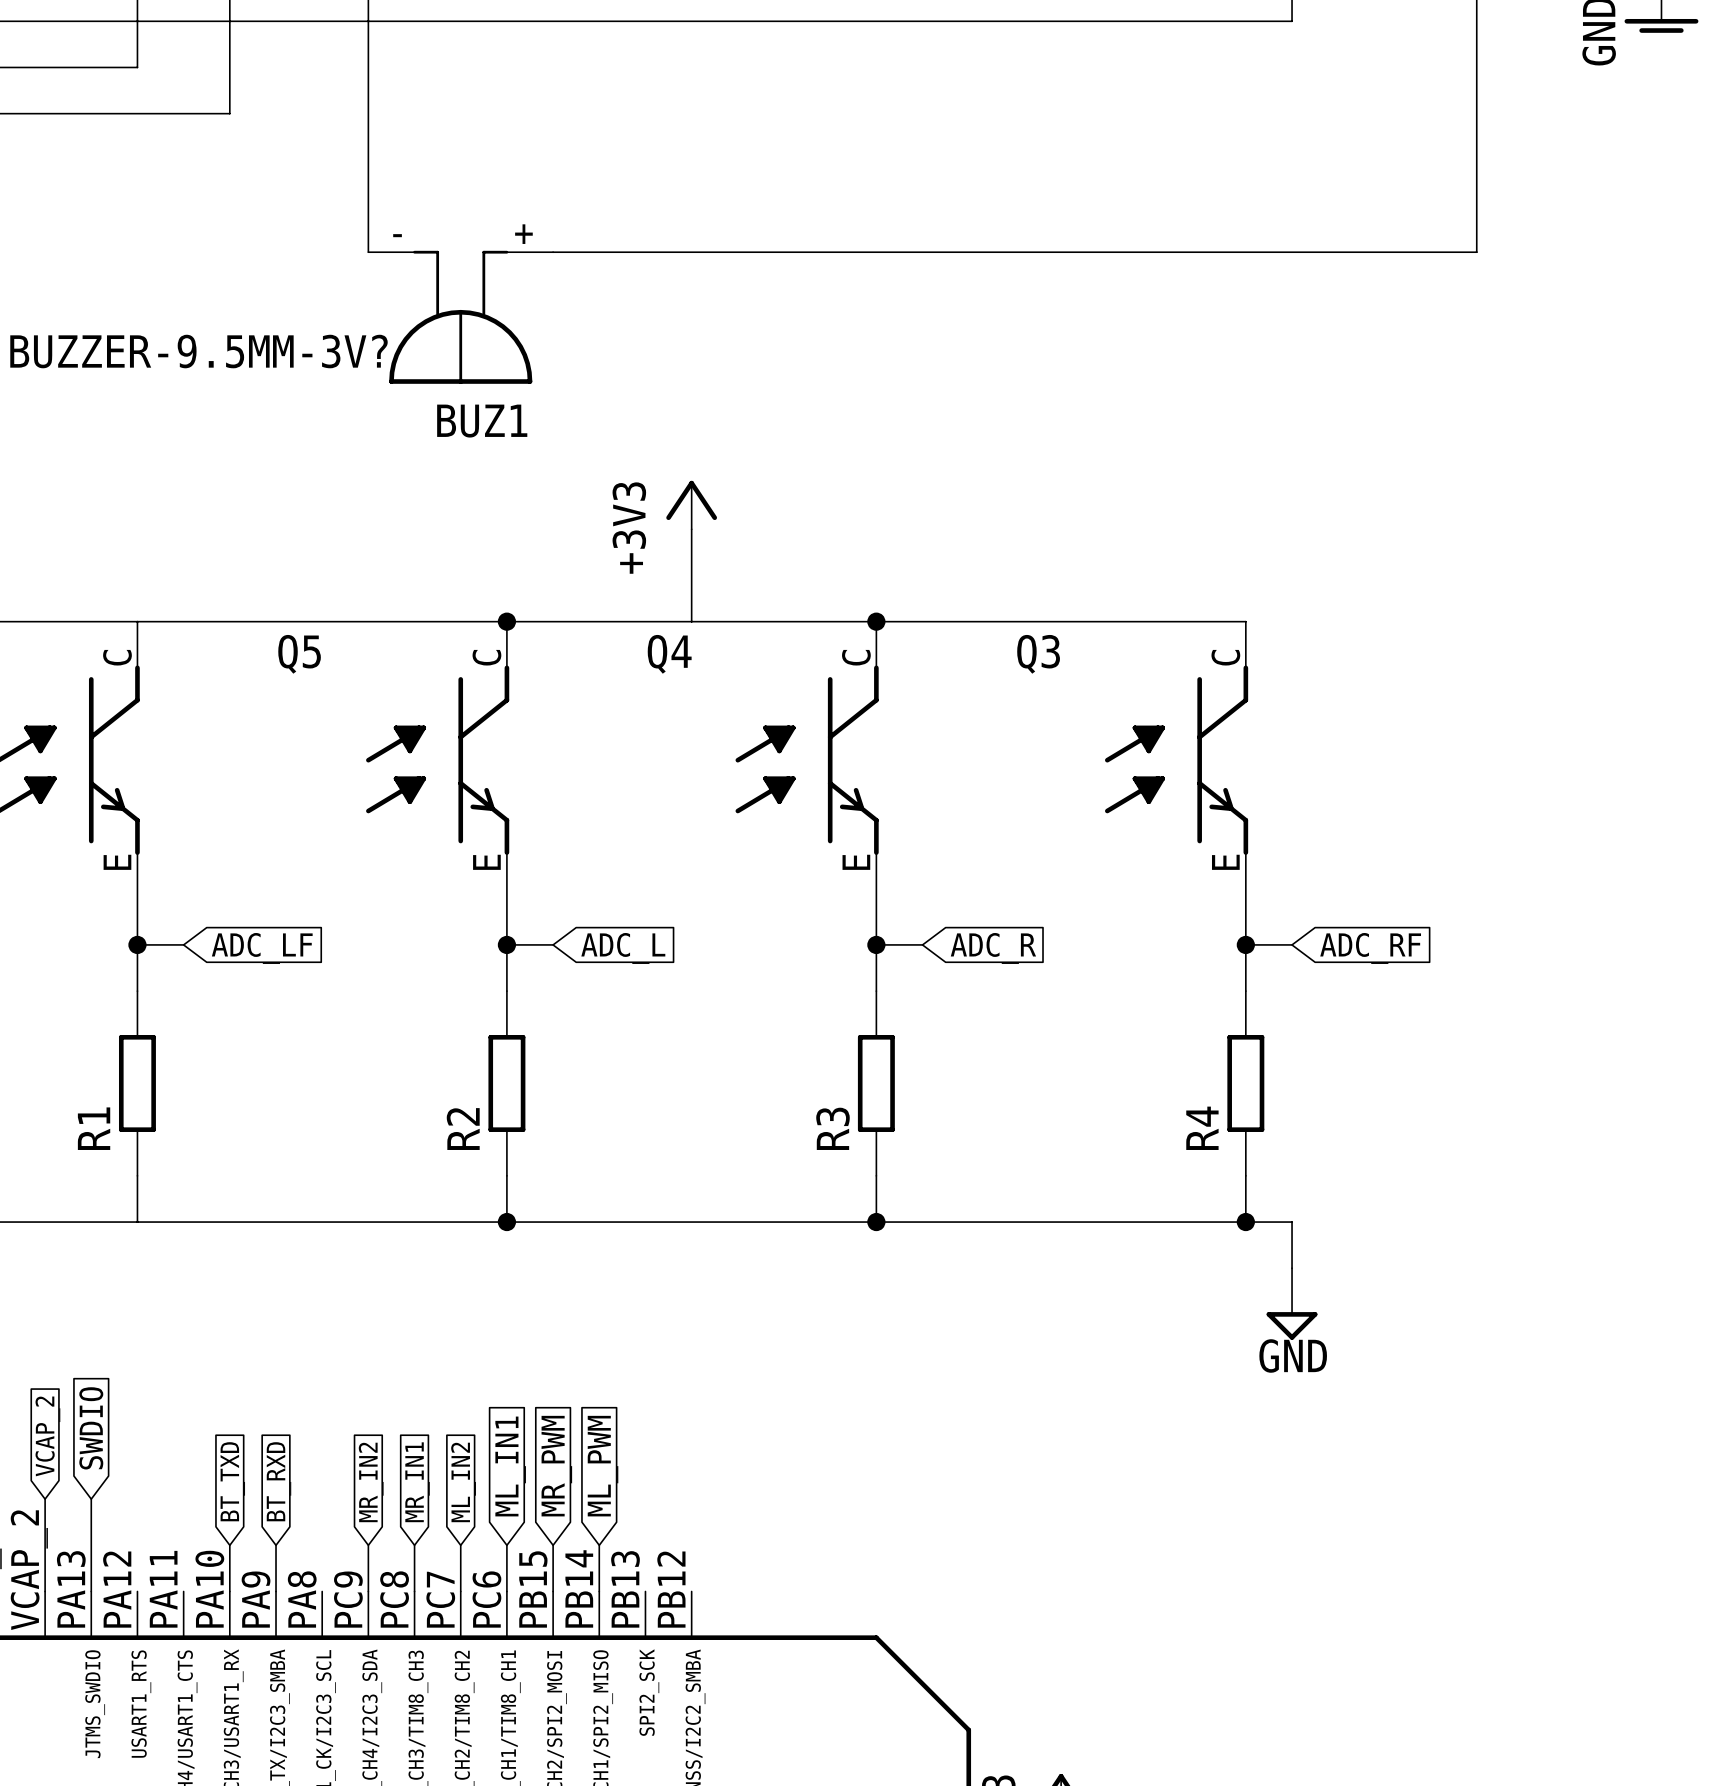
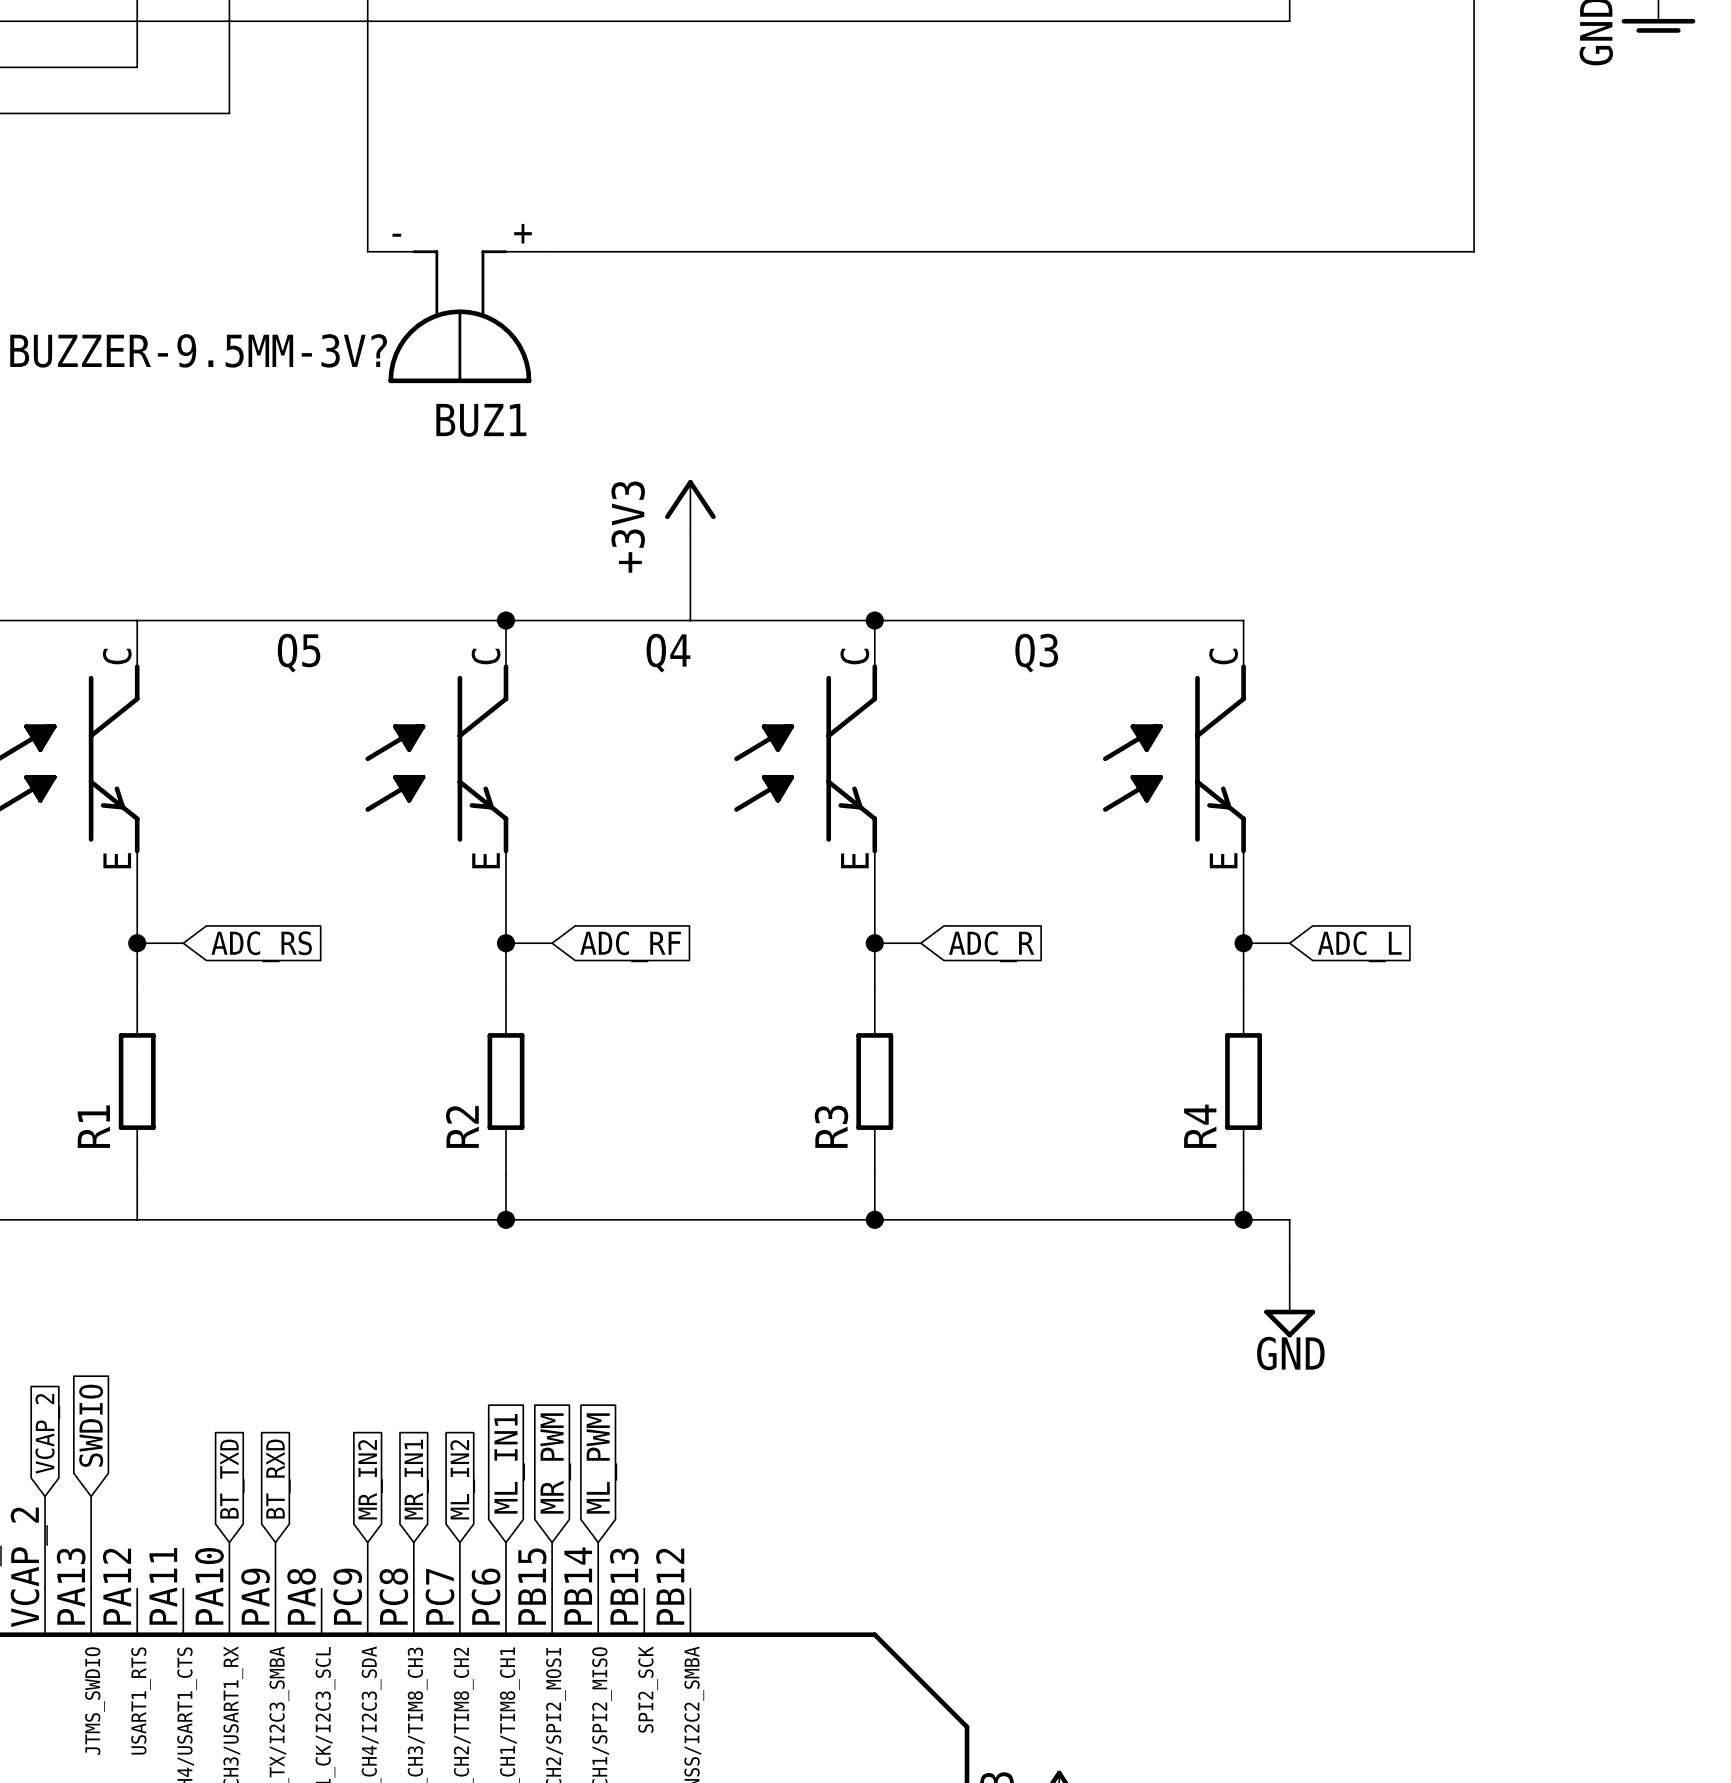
global label: ADC_LF (262, 948) -> ADC_RS (261, 946)
global label: ADC_L (623, 948) -> ADC_RF (630, 946)
global label: ADC_RF (1370, 948) -> ADC_L (1359, 946)

